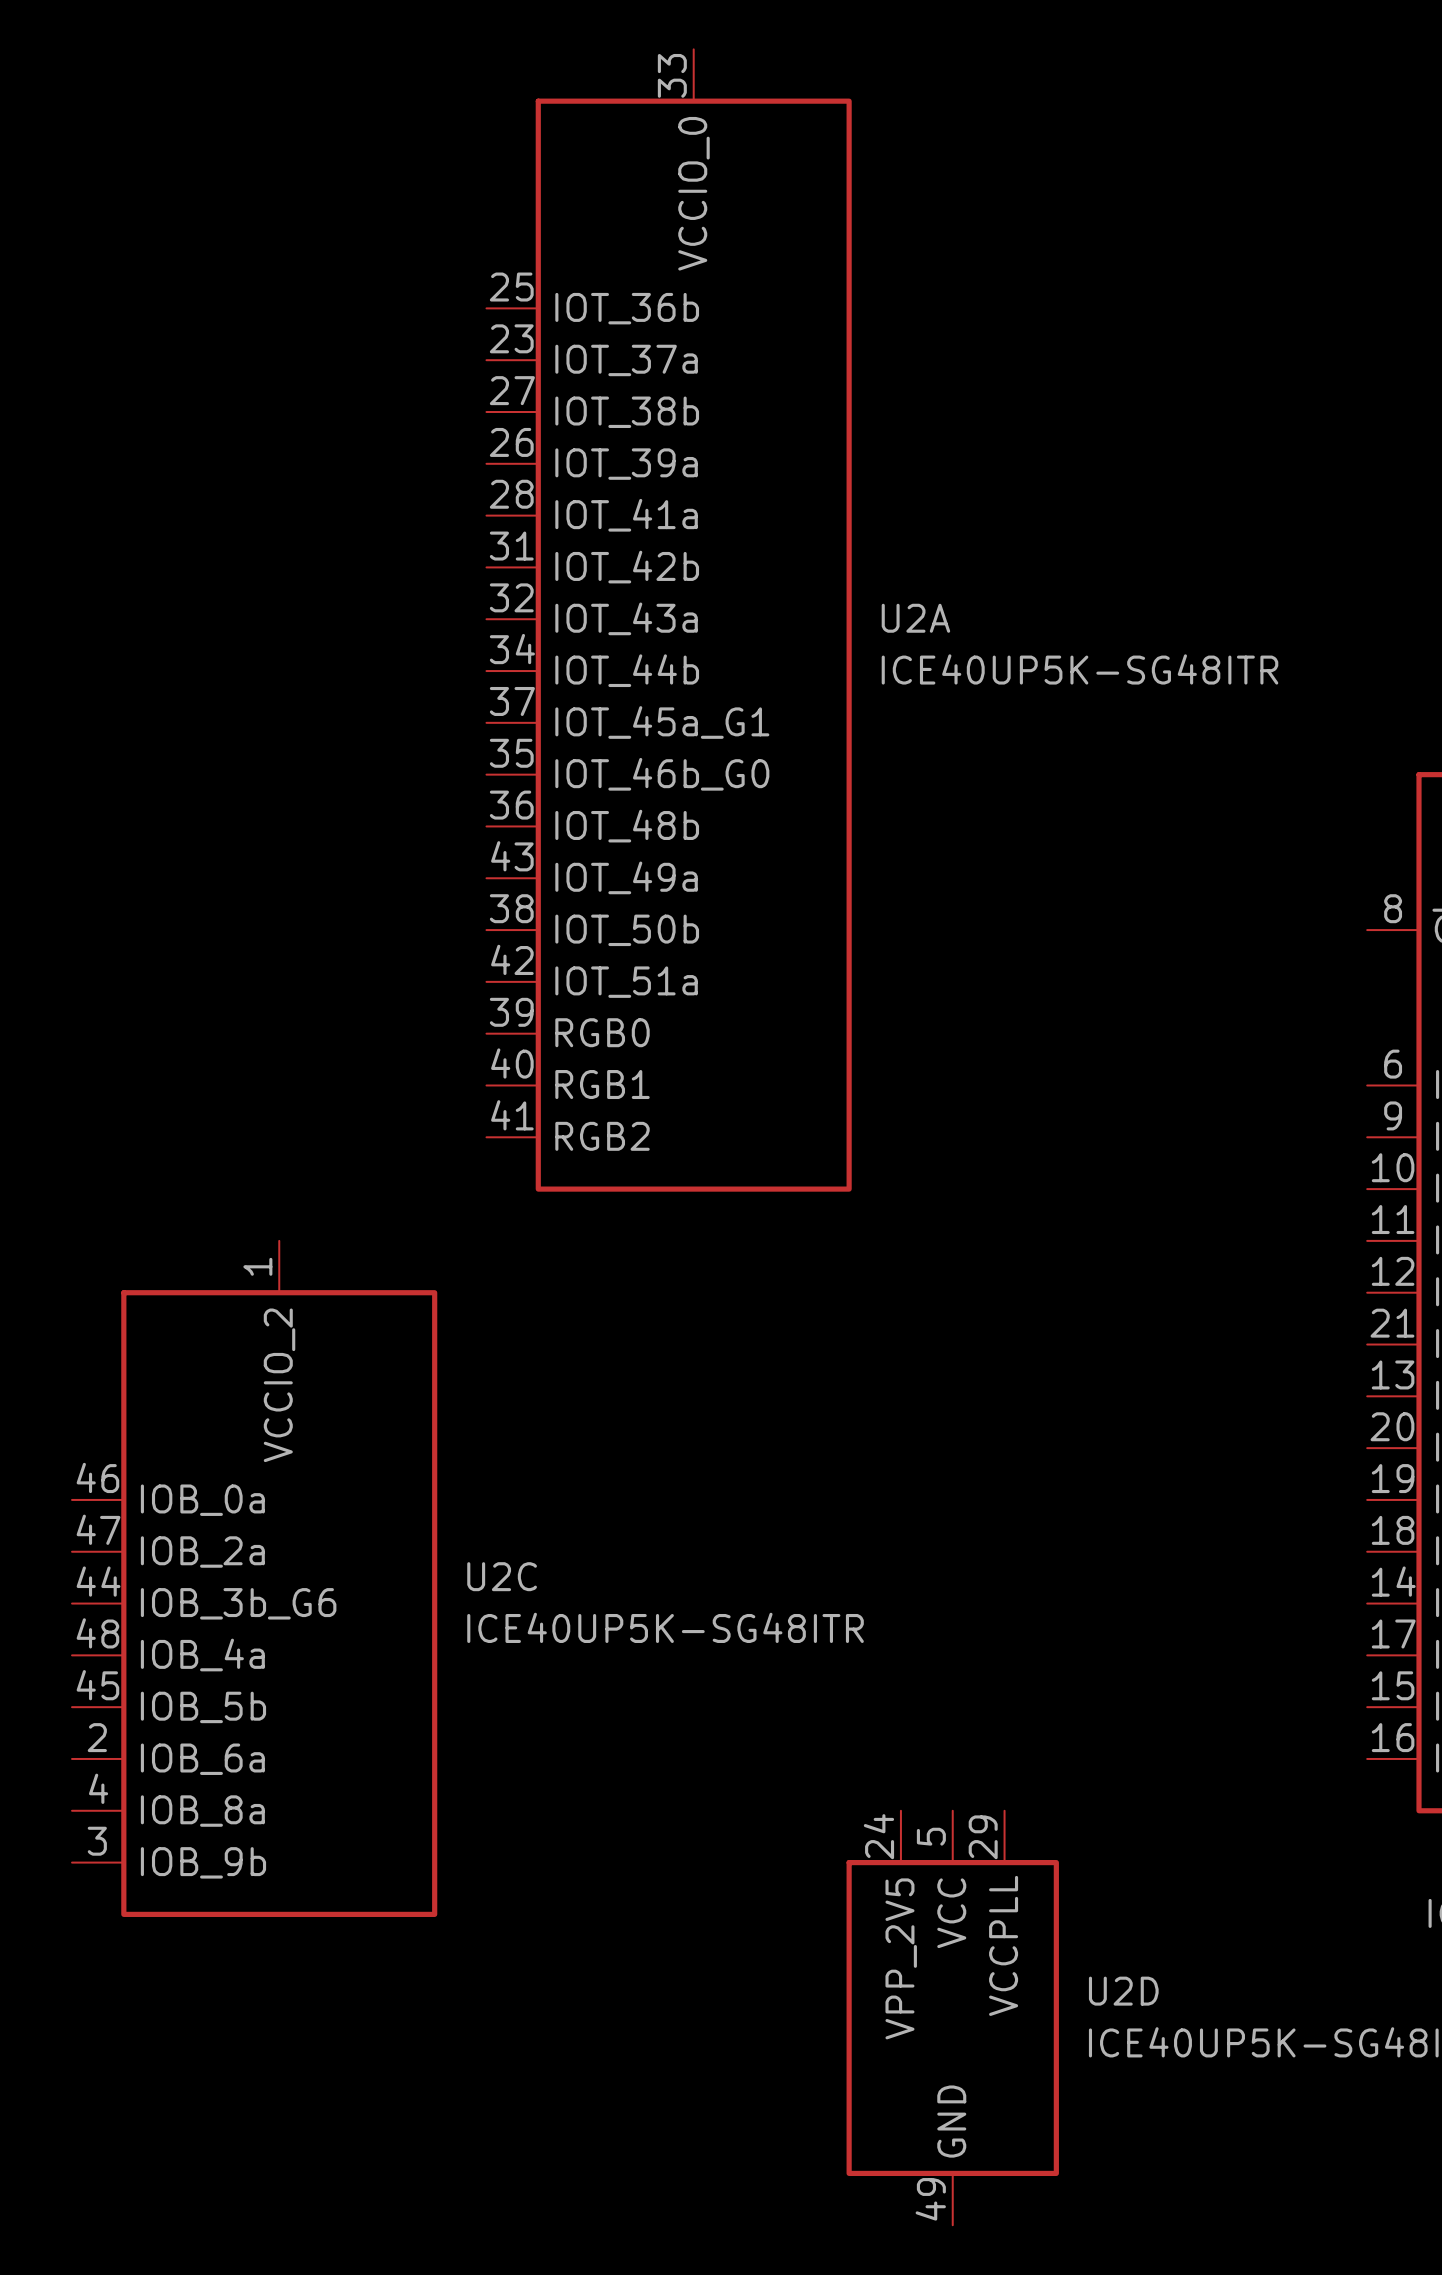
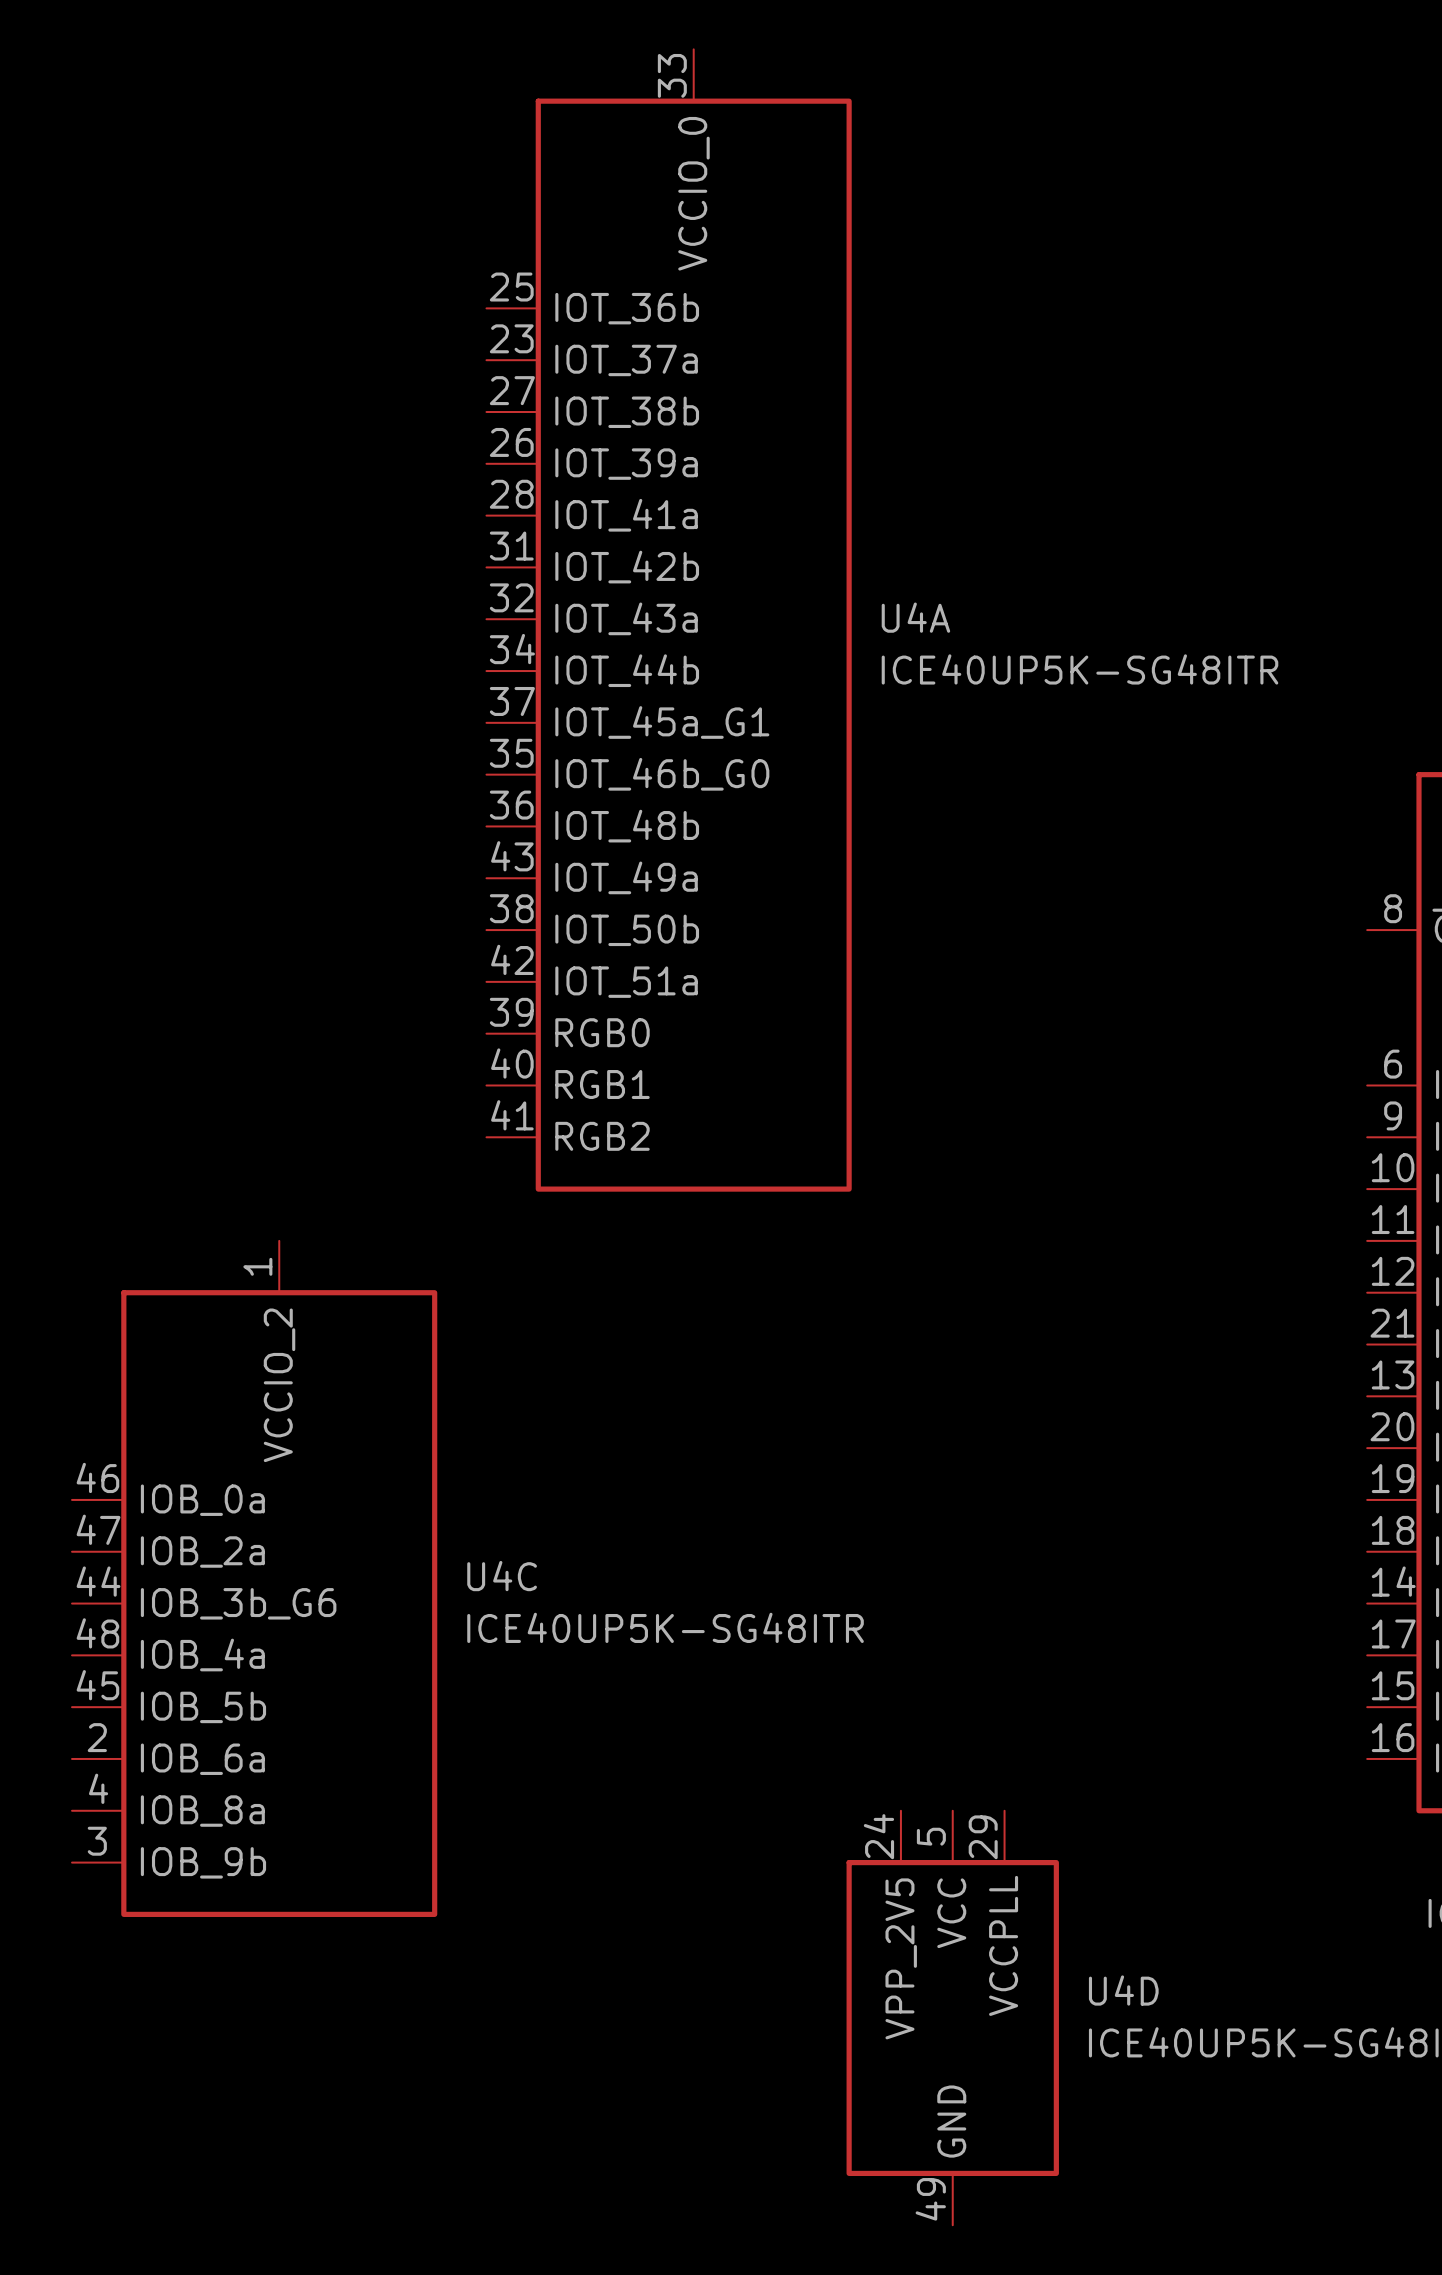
U2A name: U2A (915, 618) -> U4A (915, 617)
U2C name: U2C (502, 1576) -> U4C (502, 1576)
U2D name: U2D (1123, 1991) -> U4D (1123, 1990)

